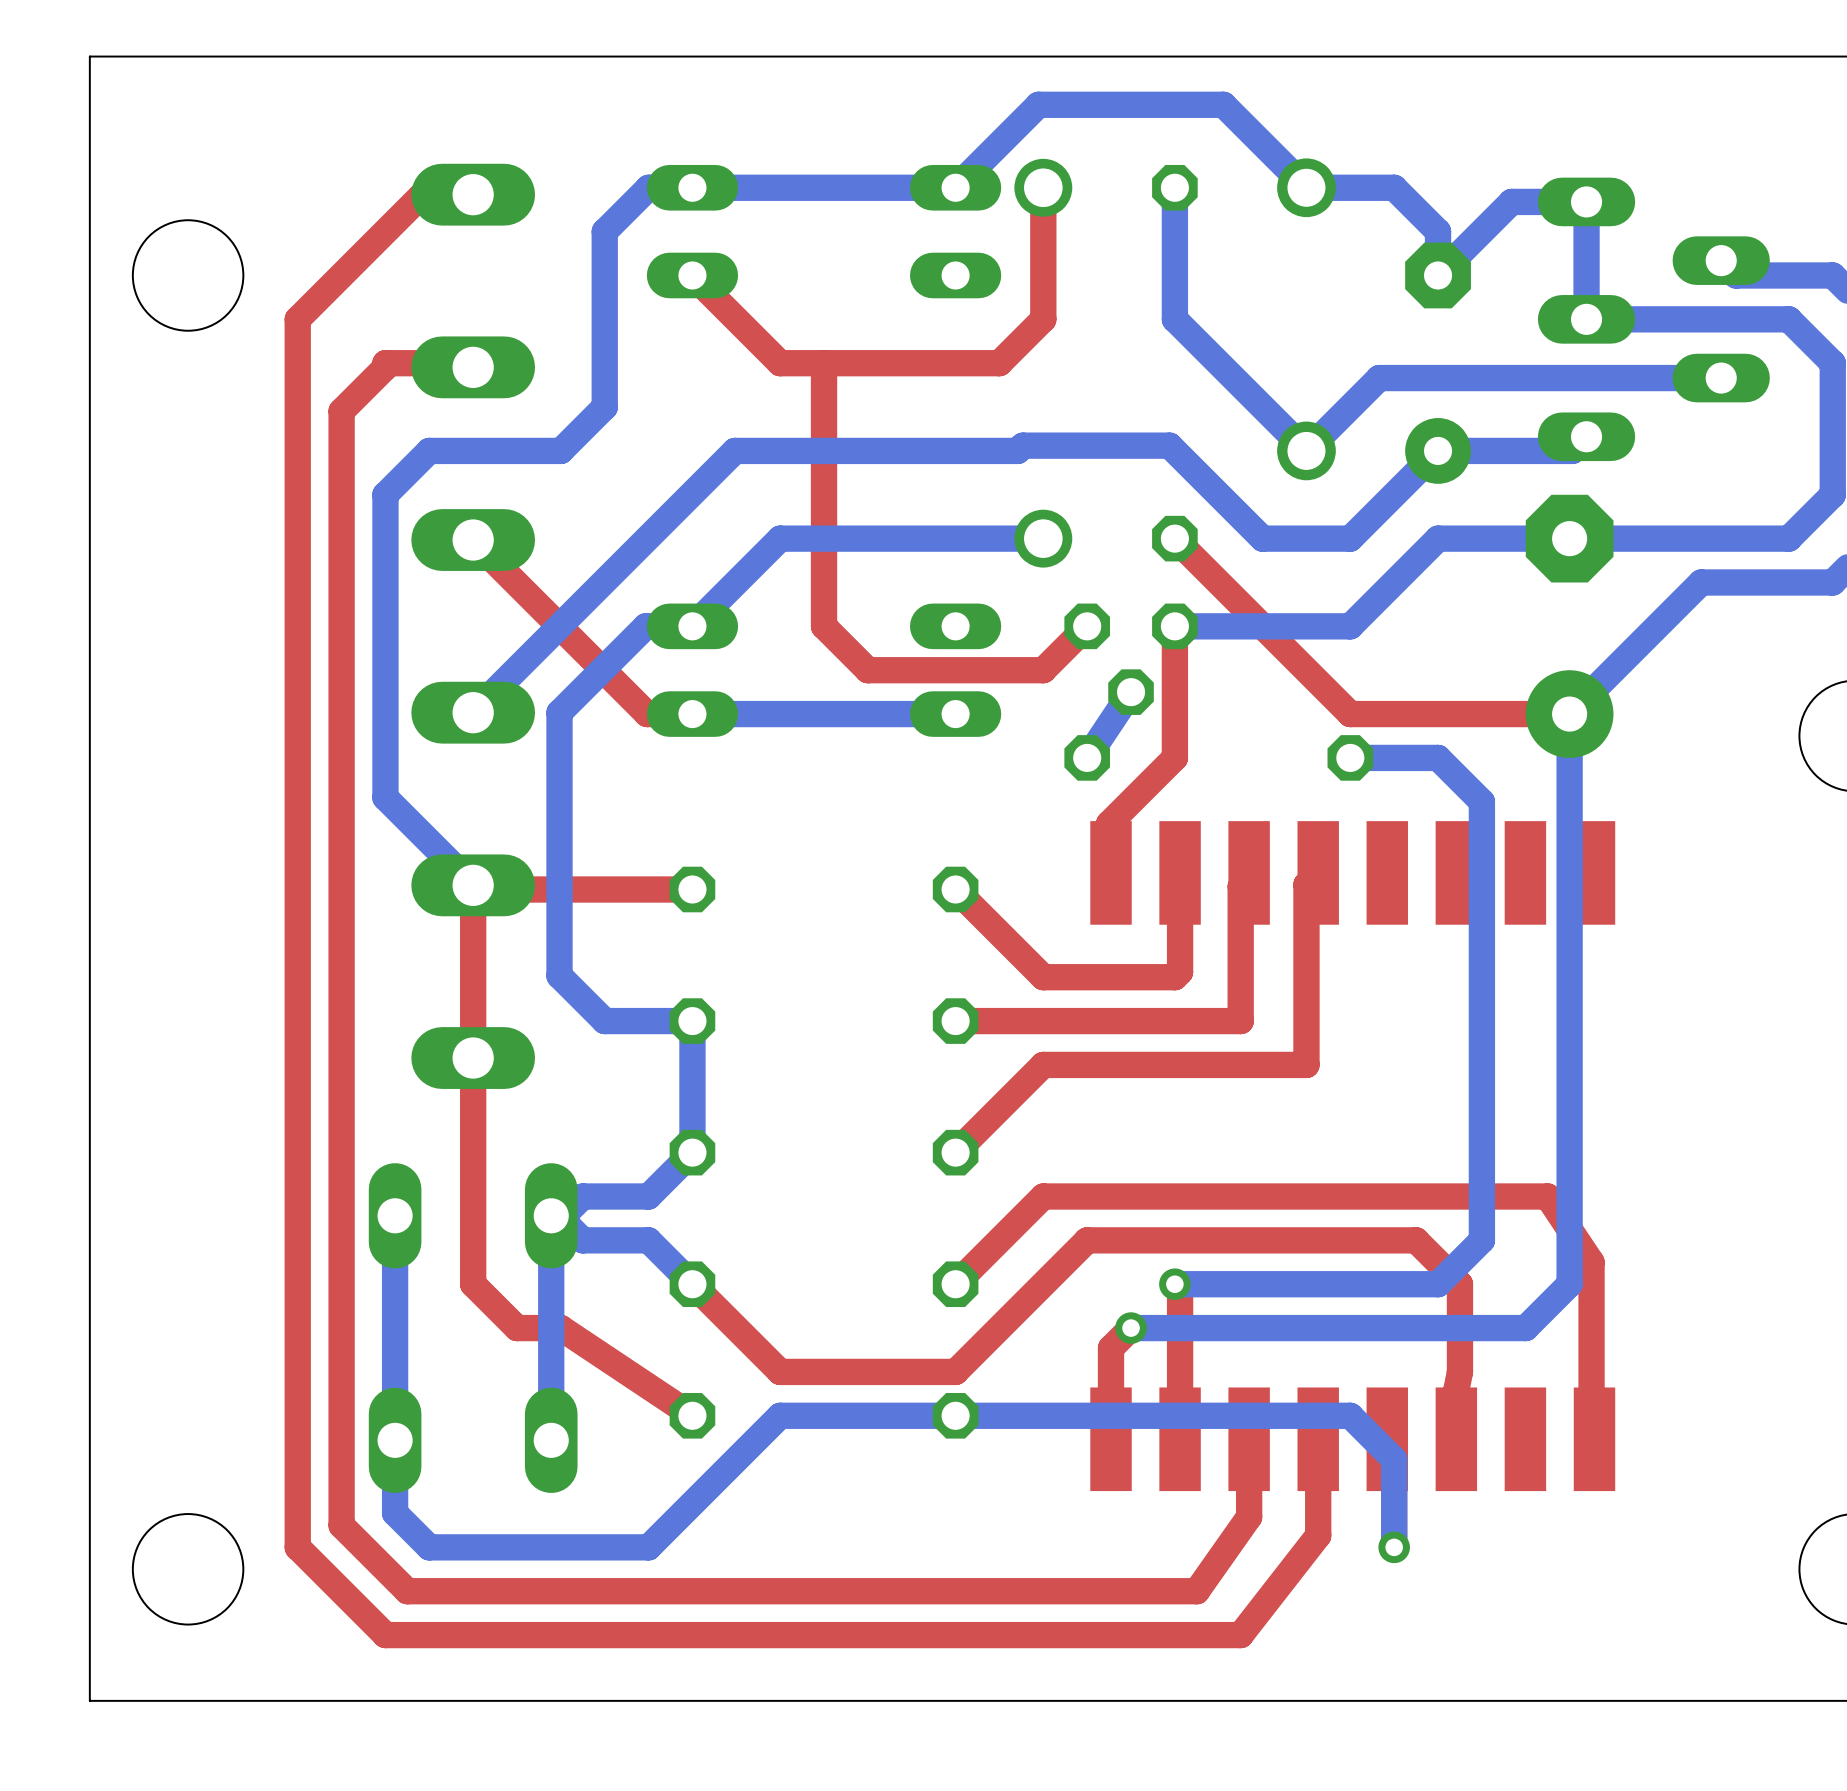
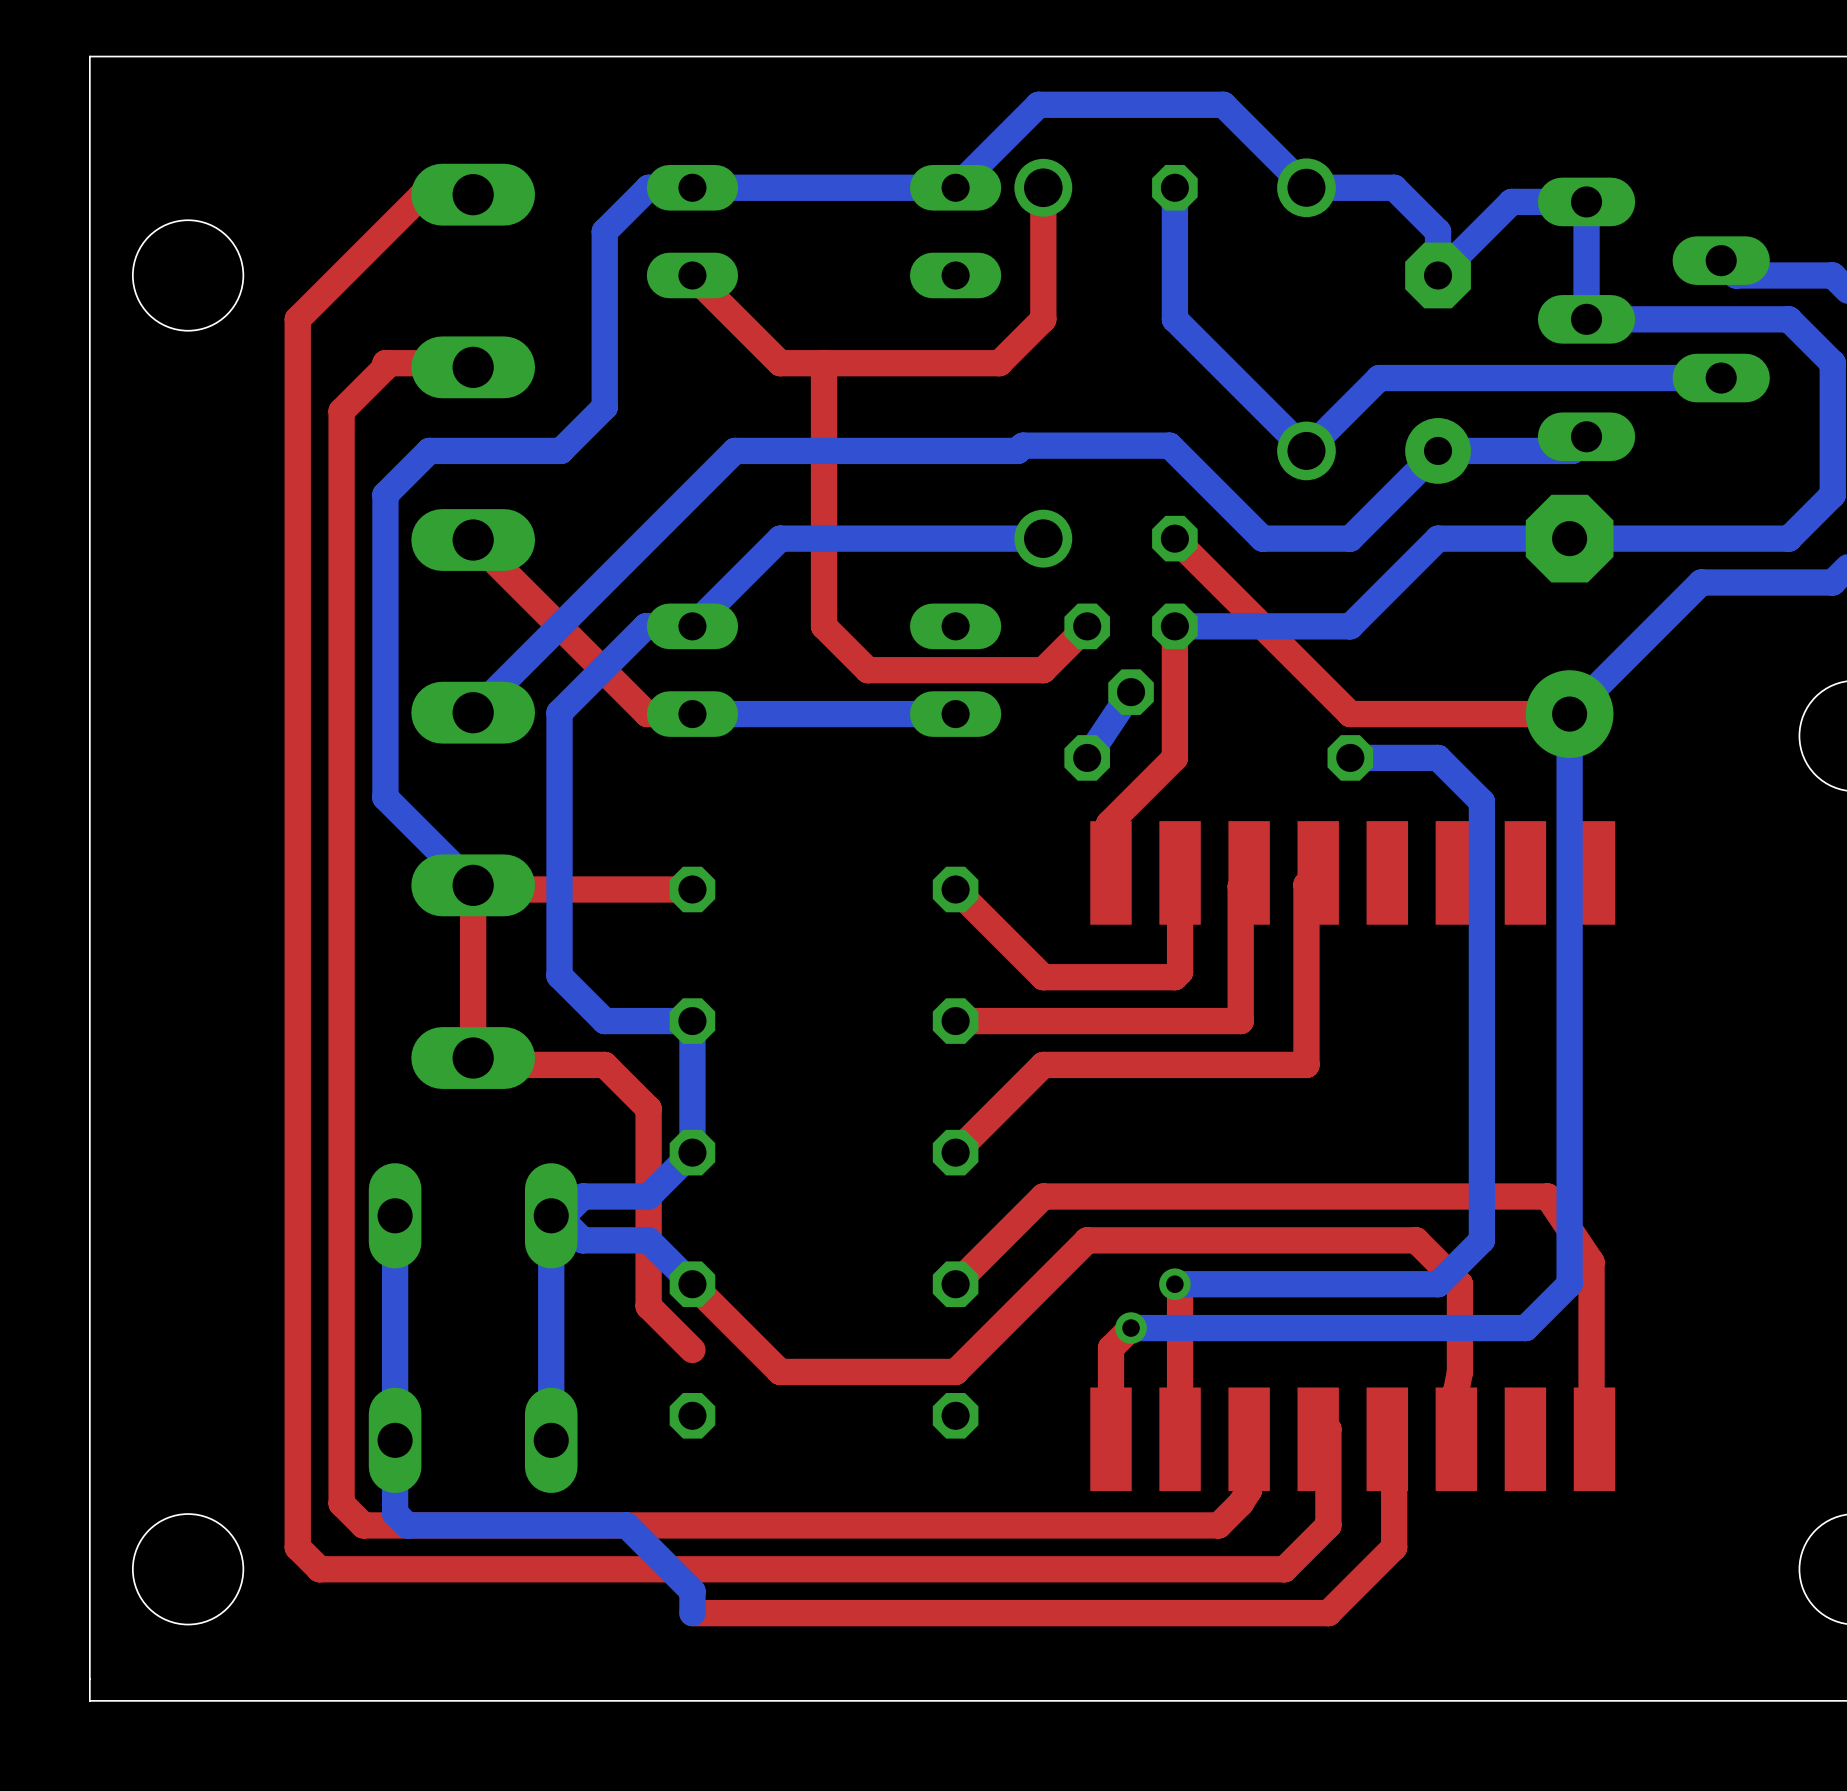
top track: (473, 1058) (473, 1284) (517, 1328) (560, 1328) (692, 1415) -> (473, 1058) (480, 1064) (604, 1064) (648, 1108) (648, 1306) (692, 1350)
top track: (1318, 1439) (1318, 1535) (1240, 1635) (385, 1635) (319, 1569) -> (1318, 1439) (1328, 1429) (1328, 1525) (1284, 1569) (319, 1569)
top track: (1249, 1490) (1249, 1516) (1196, 1591) (407, 1591) (341, 1525) (341, 1503) -> (1249, 1490) (1240, 1503) (1218, 1525) (363, 1525) (341, 1503)
bottom track: (407, 1525) (429, 1547) (648, 1547) (780, 1415) (1350, 1415) (1394, 1459) (1394, 1547) -> (407, 1525) (626, 1525) (692, 1591) (692, 1613)
top track: none -> (1394, 1547) (1328, 1613) (692, 1613)
via: (1394, 1547) -> none

